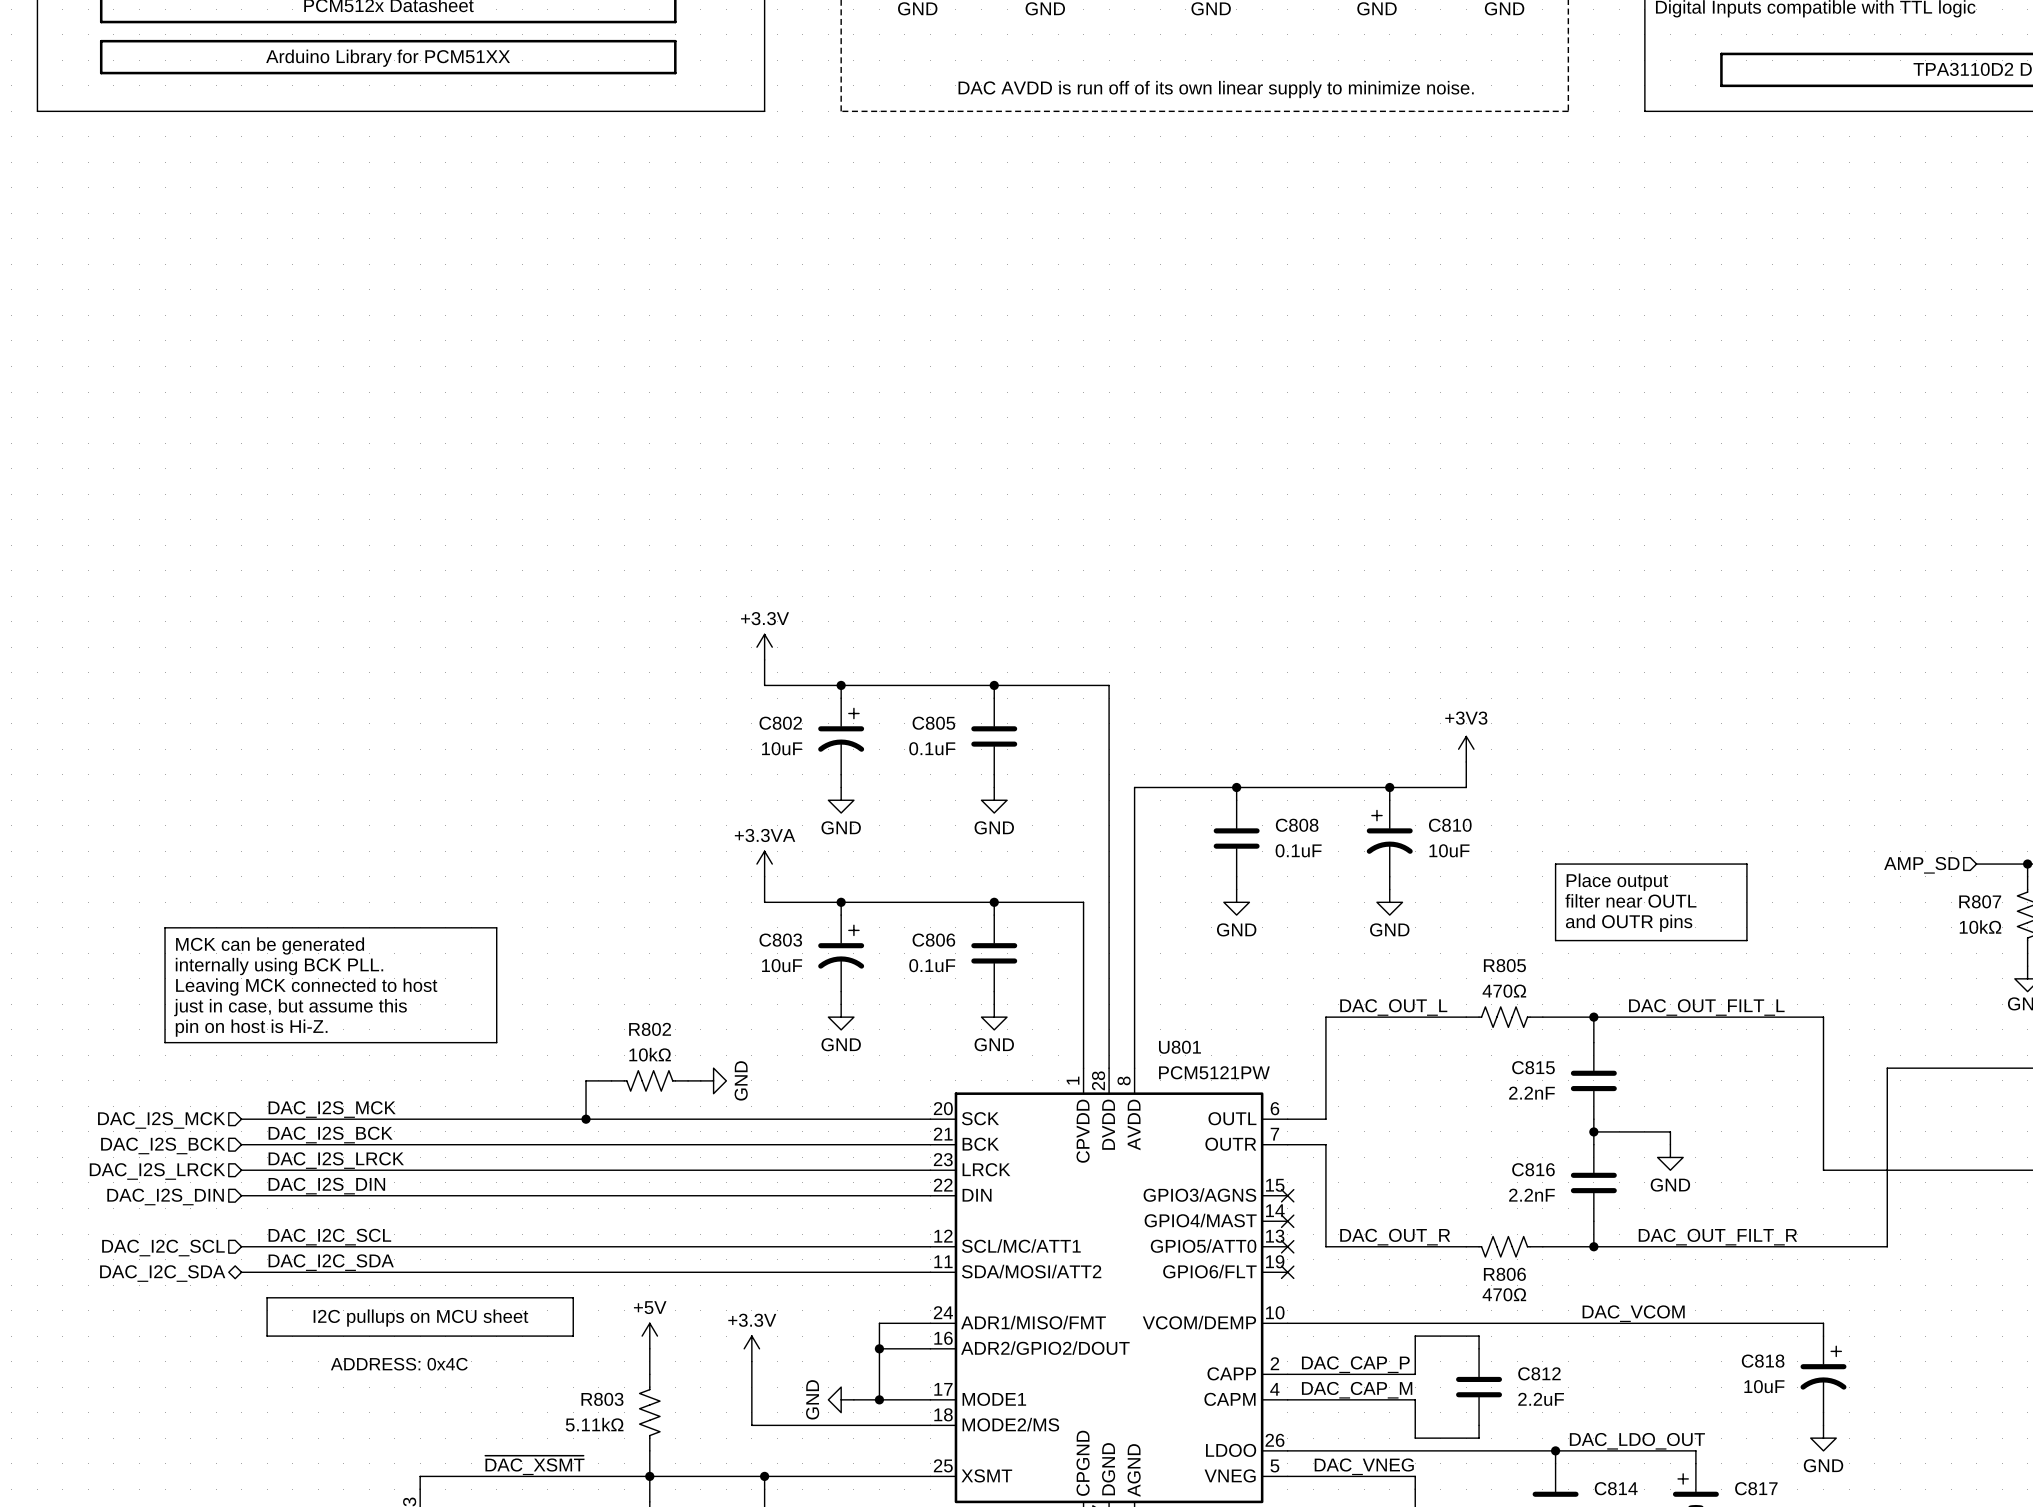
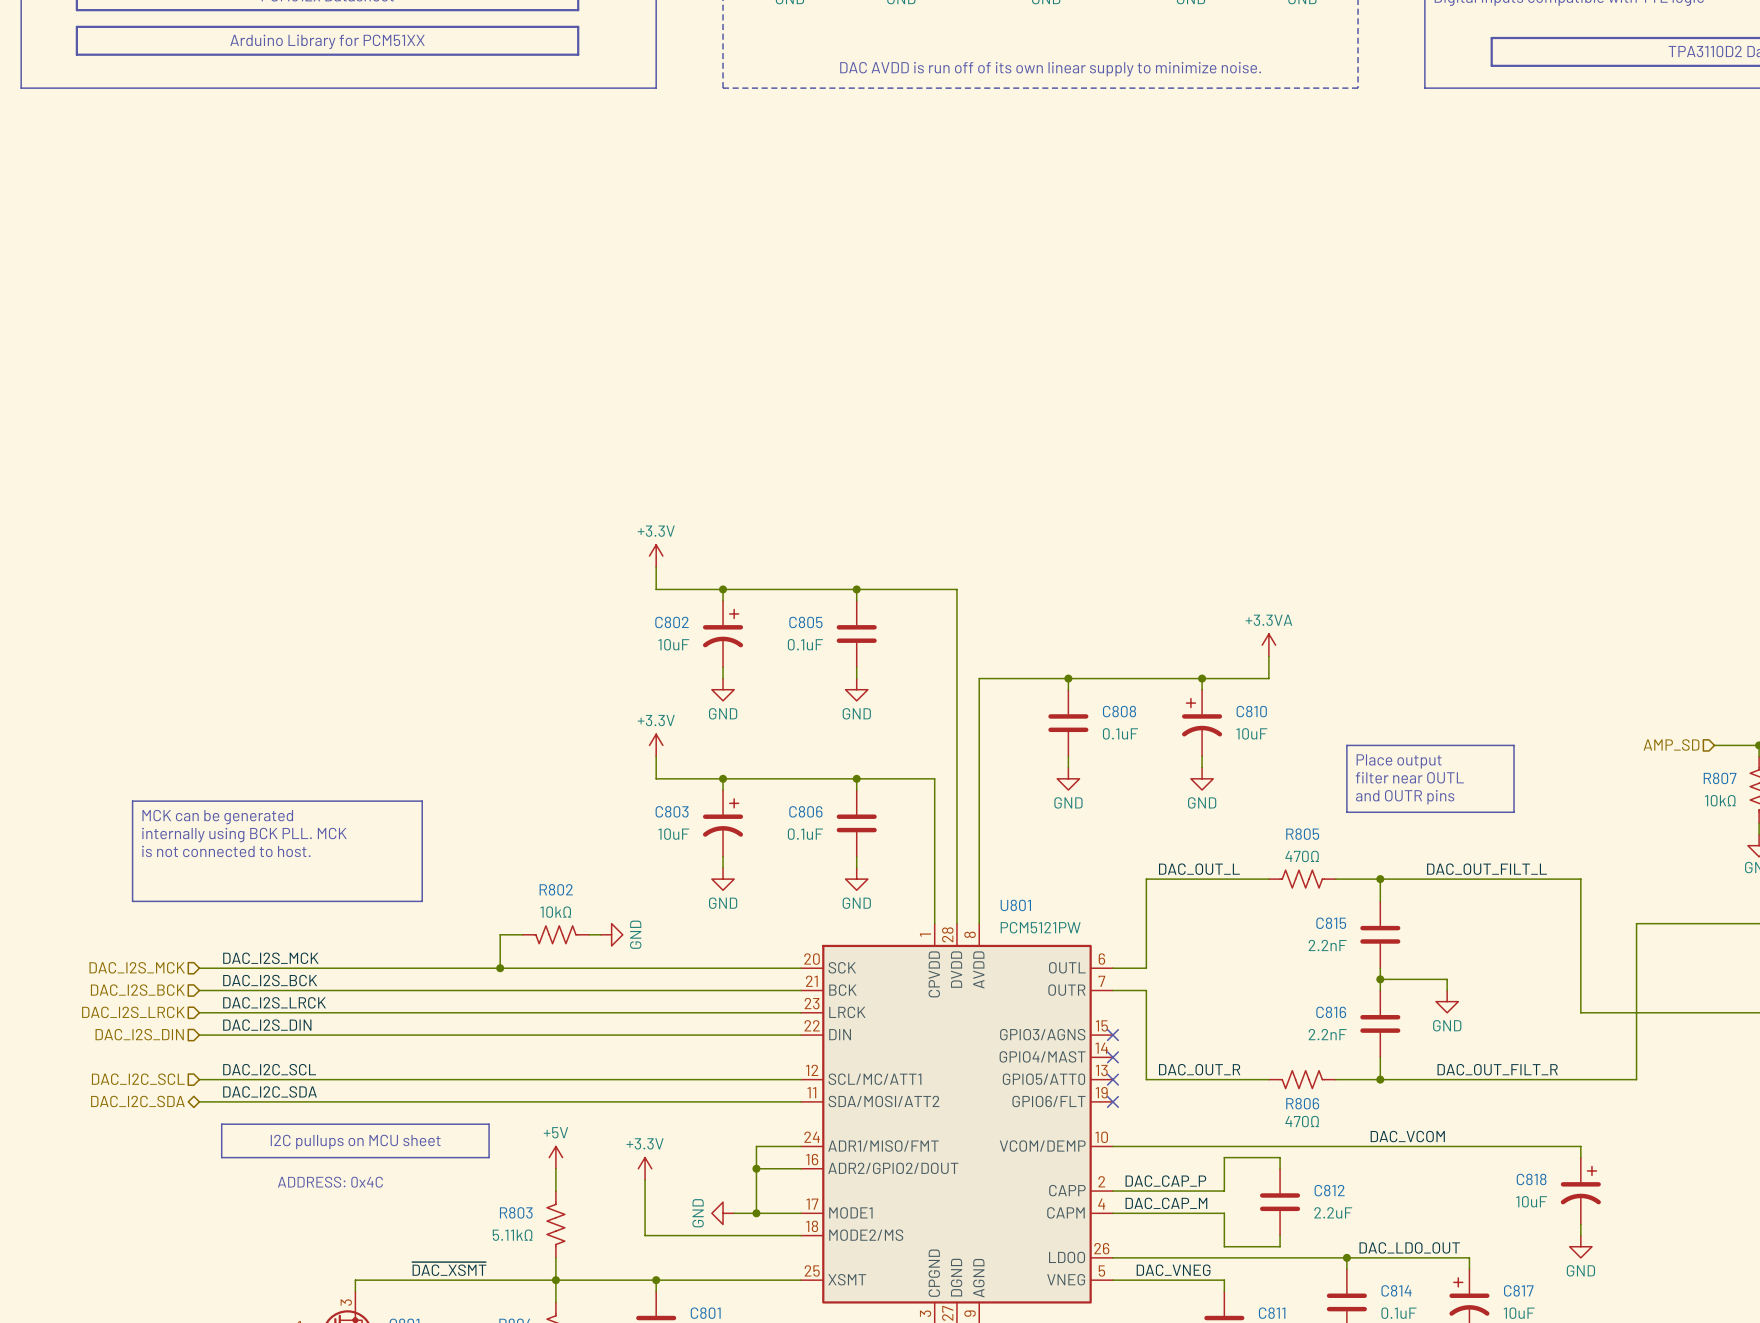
power symbol: +3V3 (1466, 749) -> +3.3VA (1268, 645)
power symbol: +3.3VA (764, 864) -> +3.3V (656, 745)
text: internally using BCK PLL. (279, 966) -> internally using BCK PLL. MCK (244, 835)
text: Leaving MCK connected to host (306, 987) -> is not connected to host. (226, 851)
text: just in case, but assume this (290, 1007) -> none
text: pin on host is Hi-Z. (251, 1028) -> none

